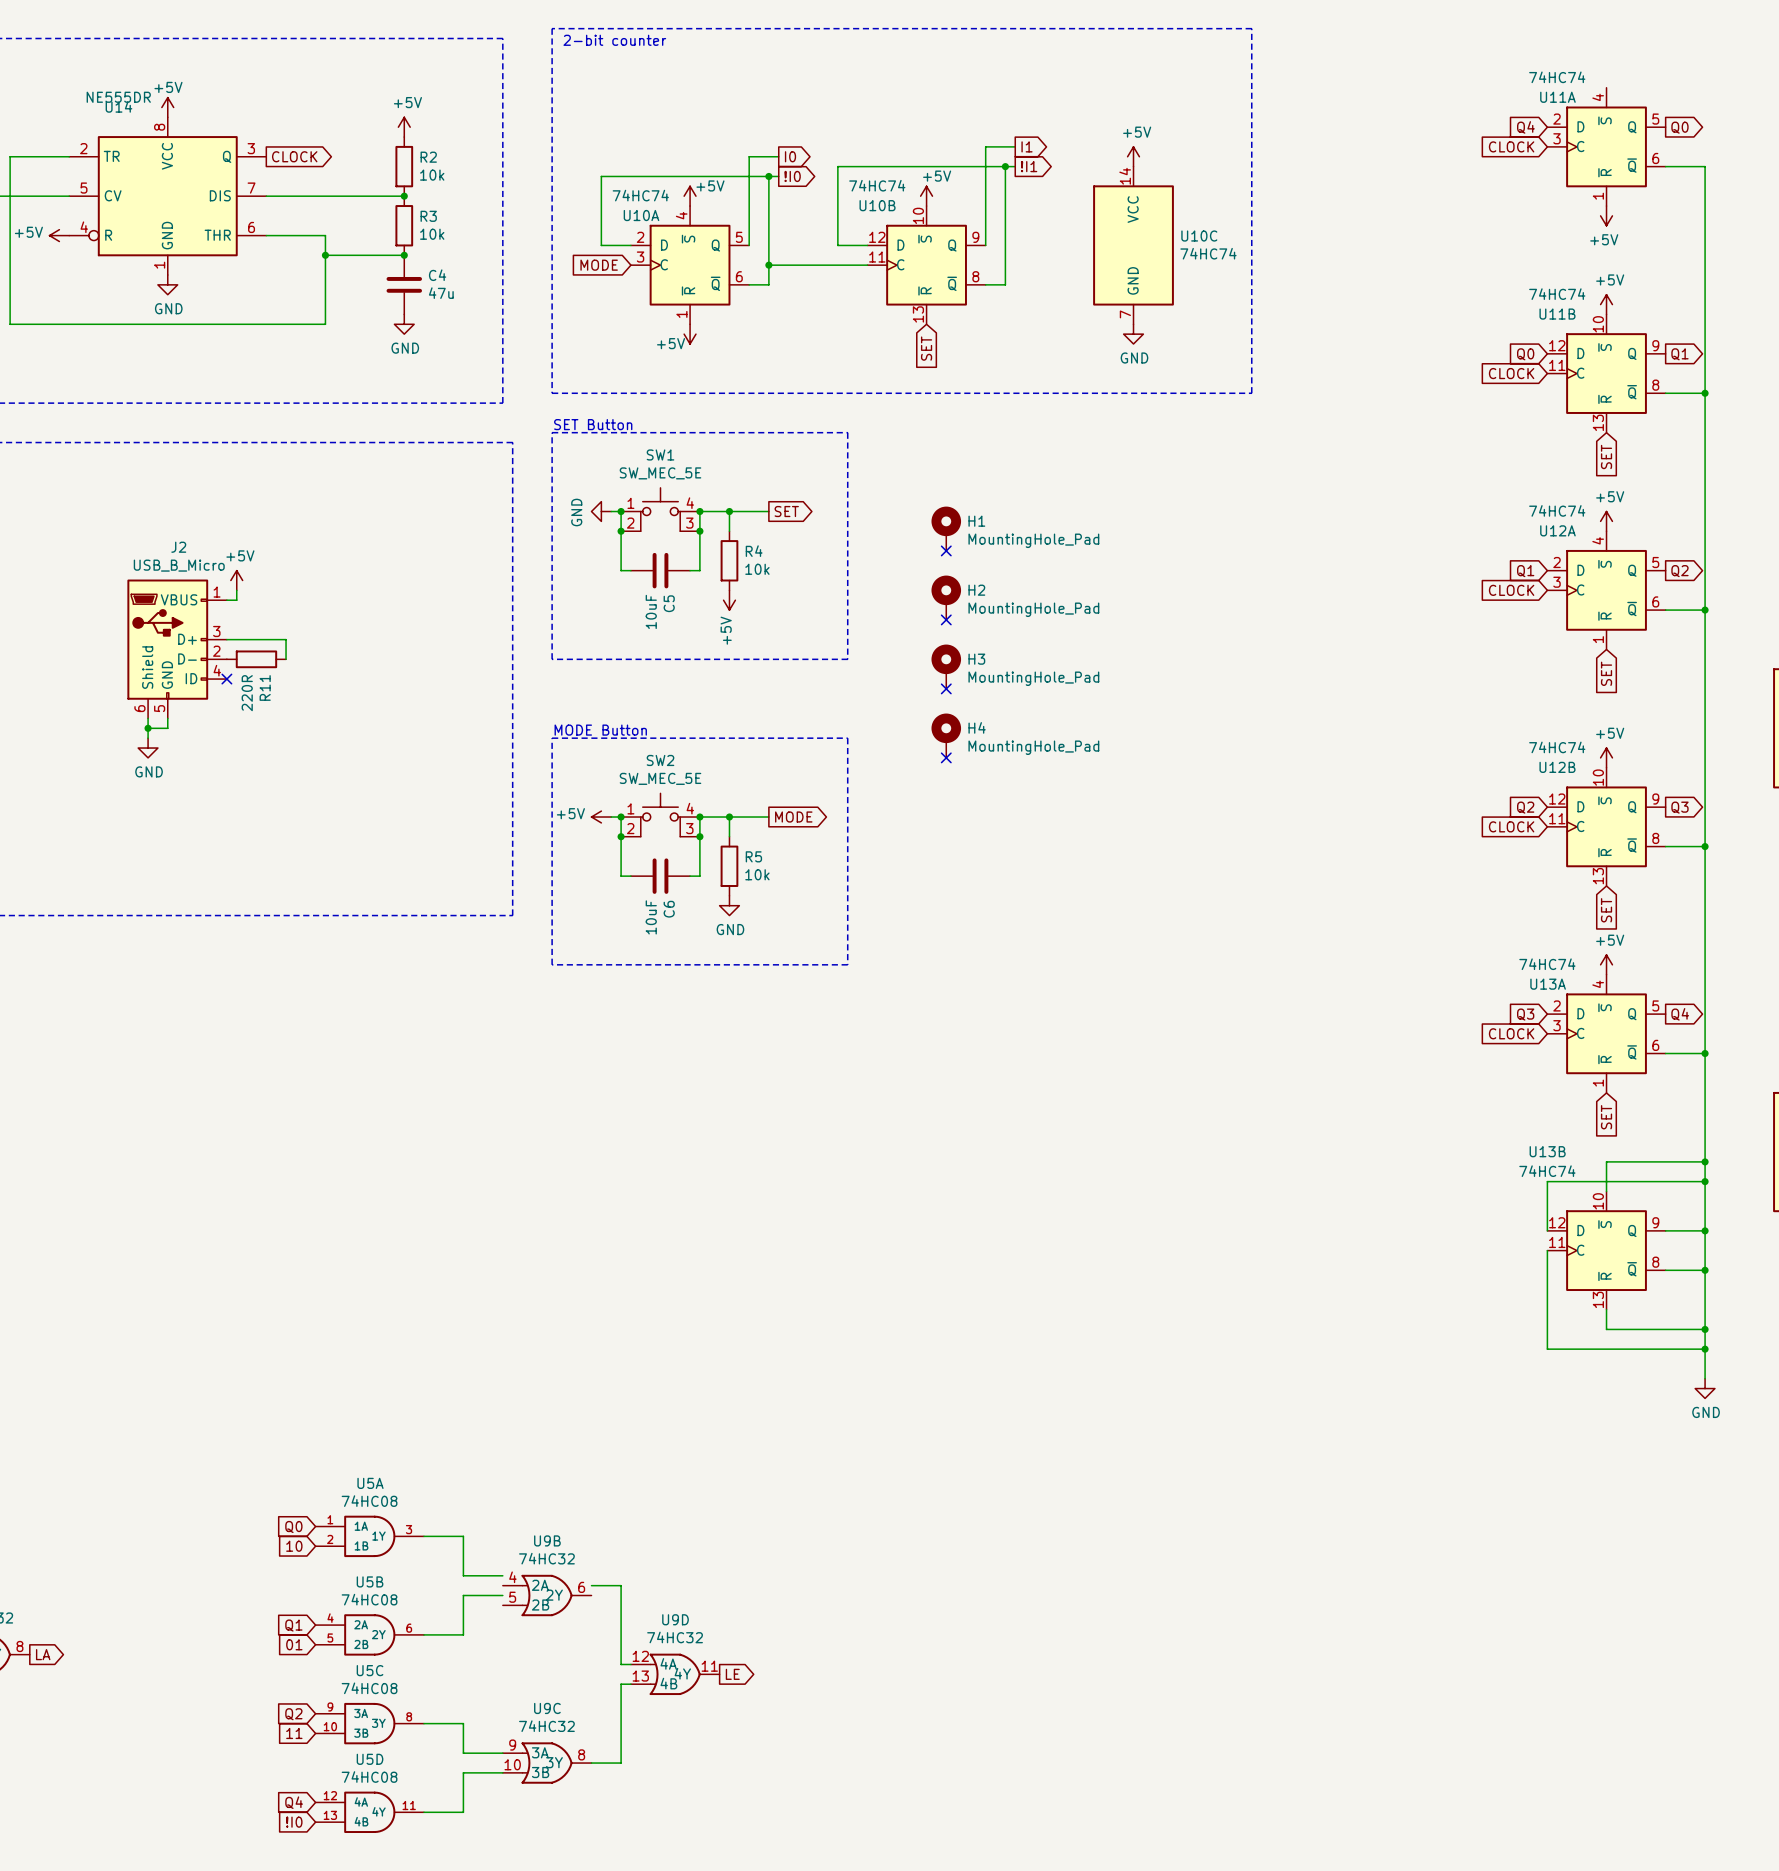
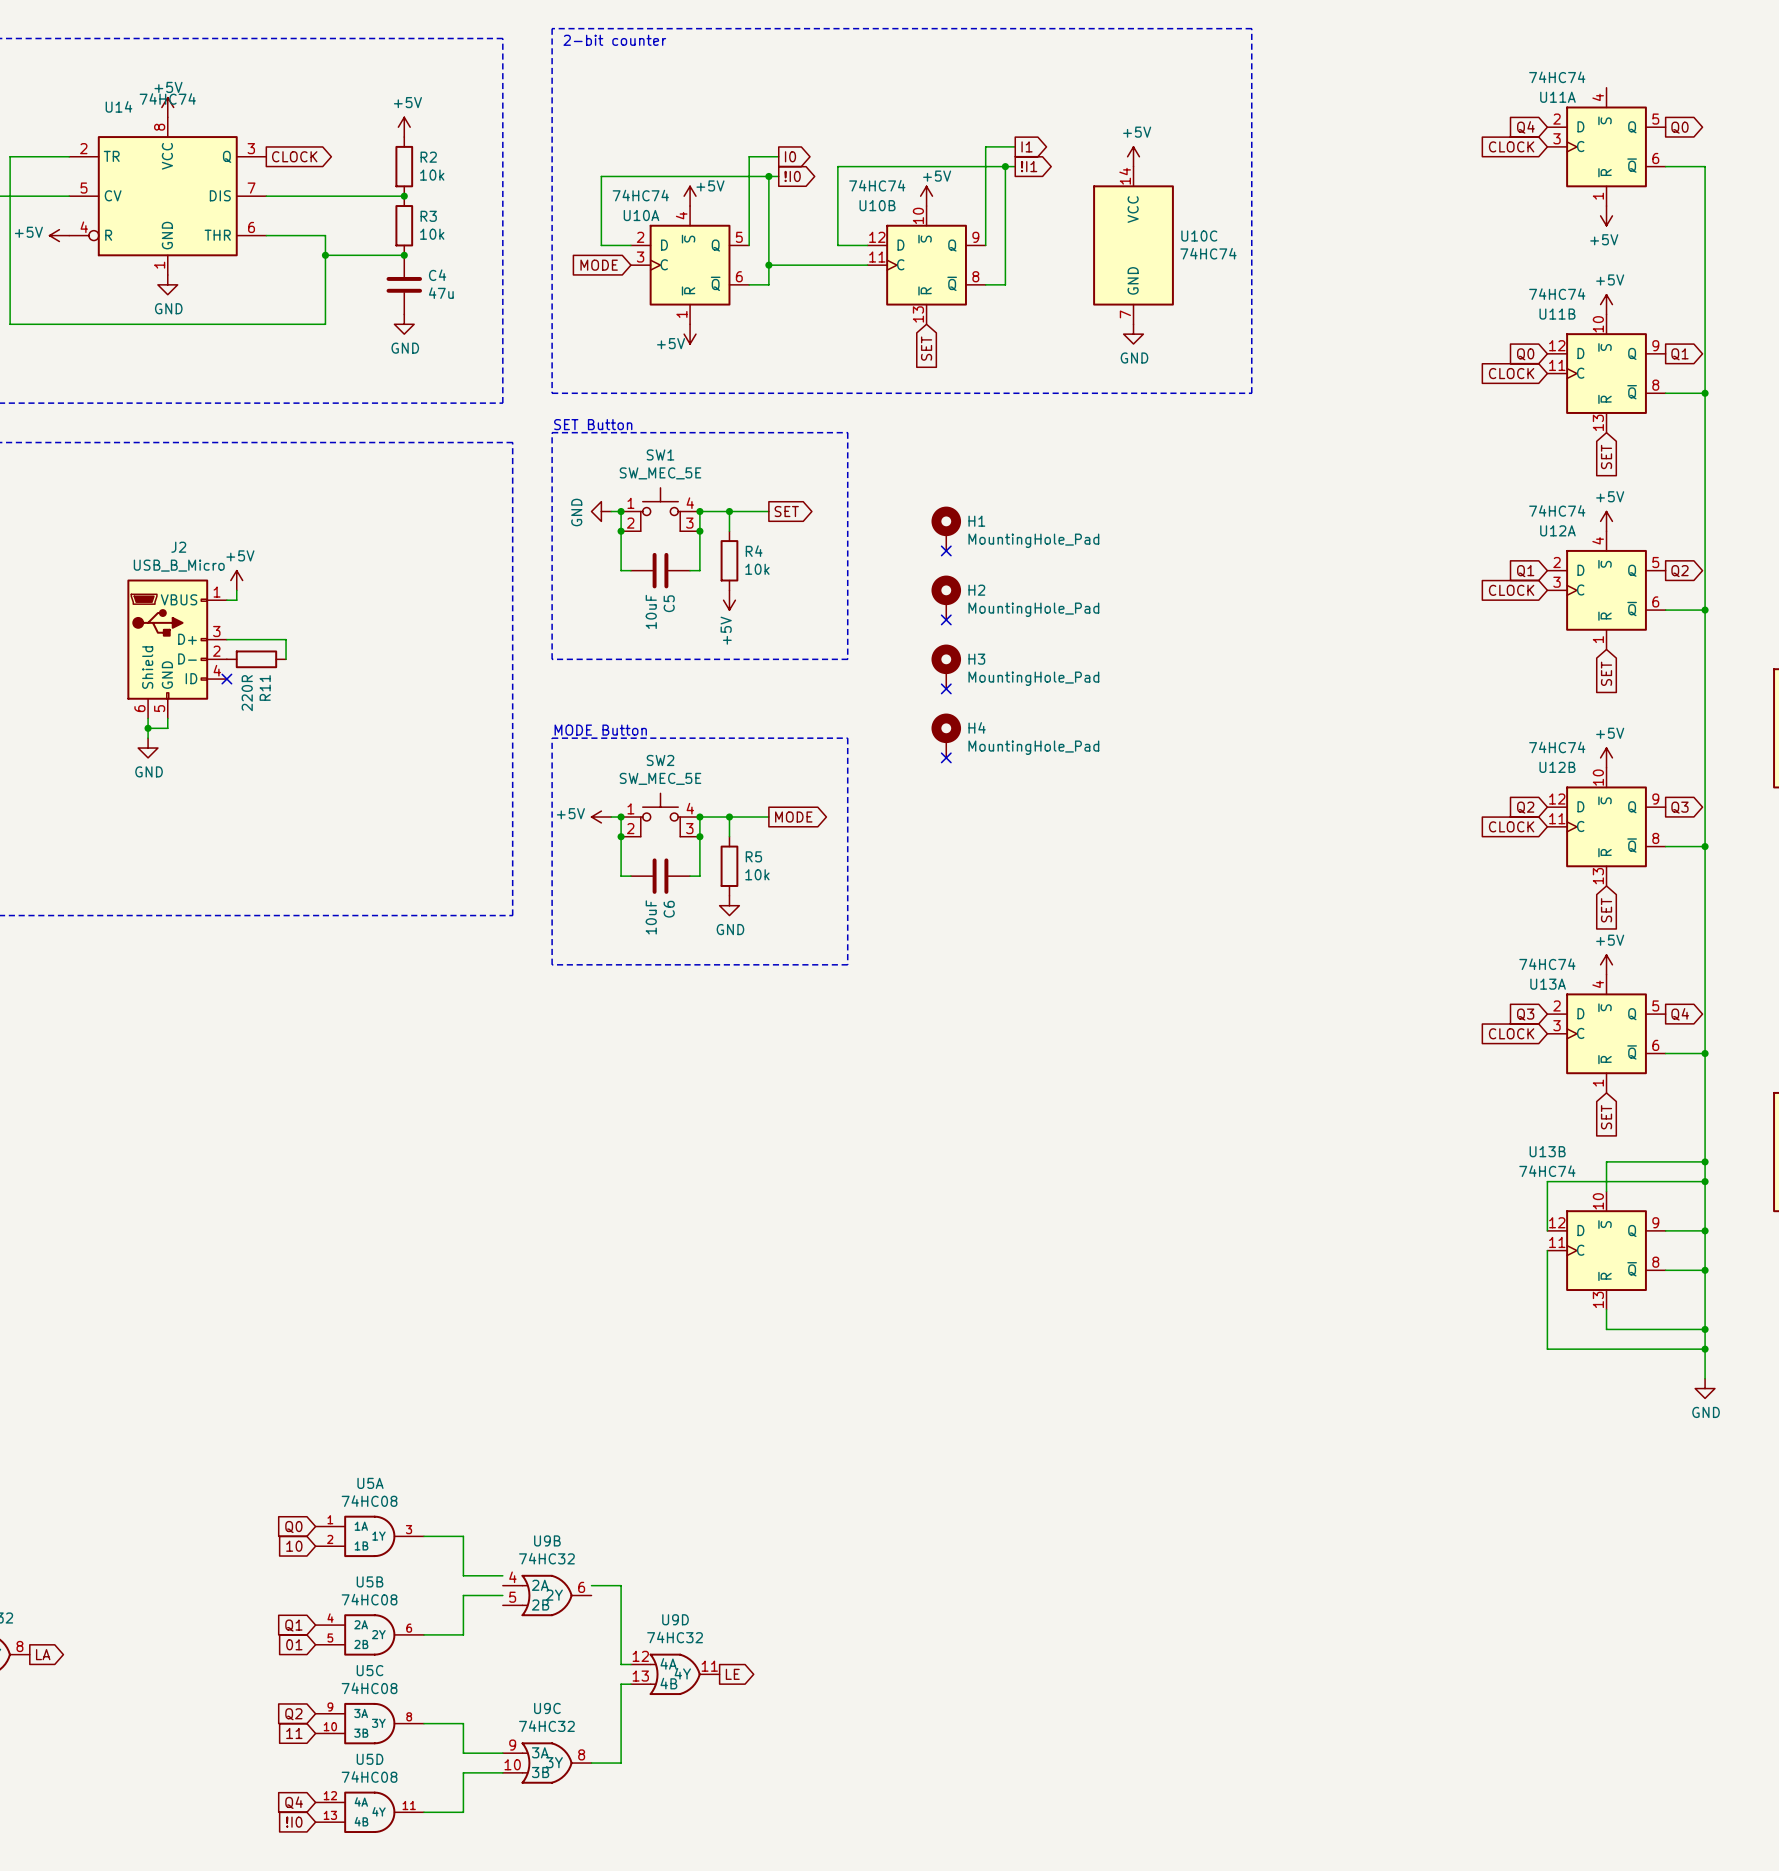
U14 value: NE555DR (118, 97) -> 74HC74 (167, 99)

